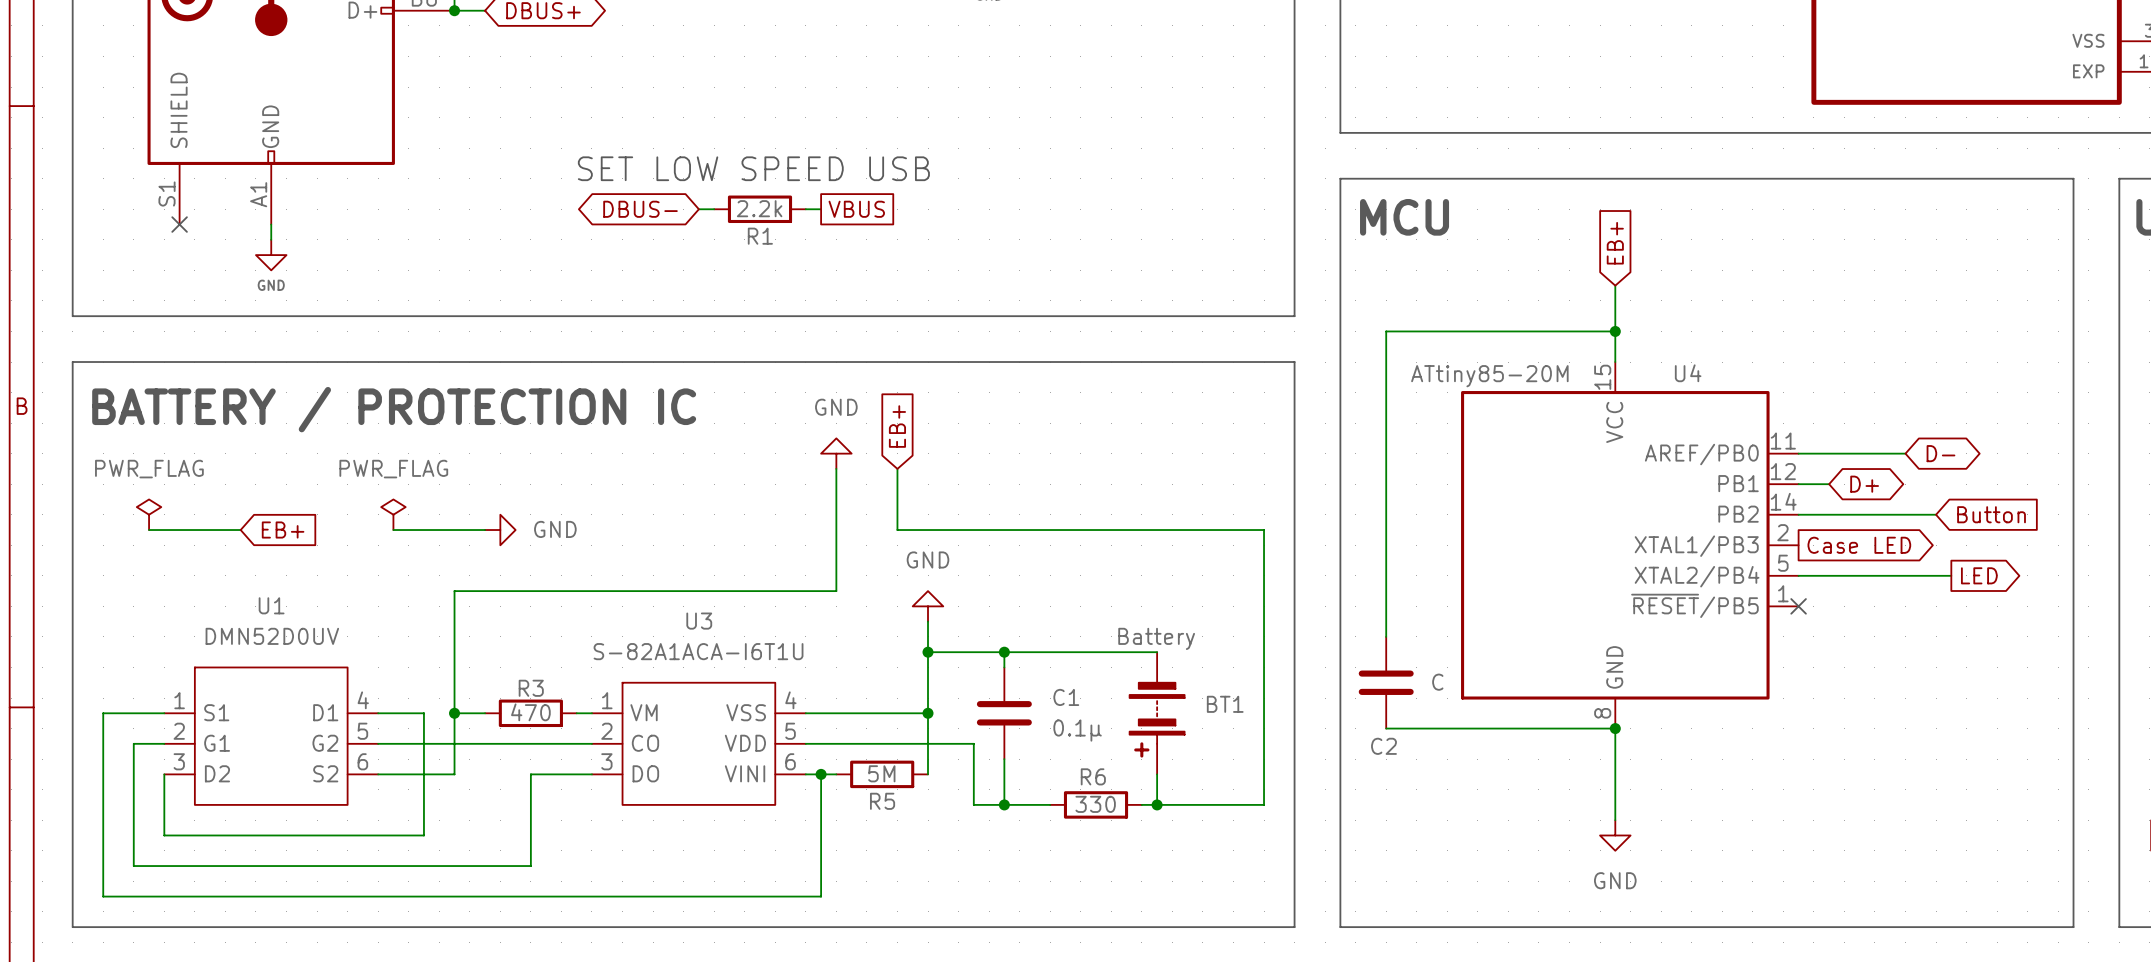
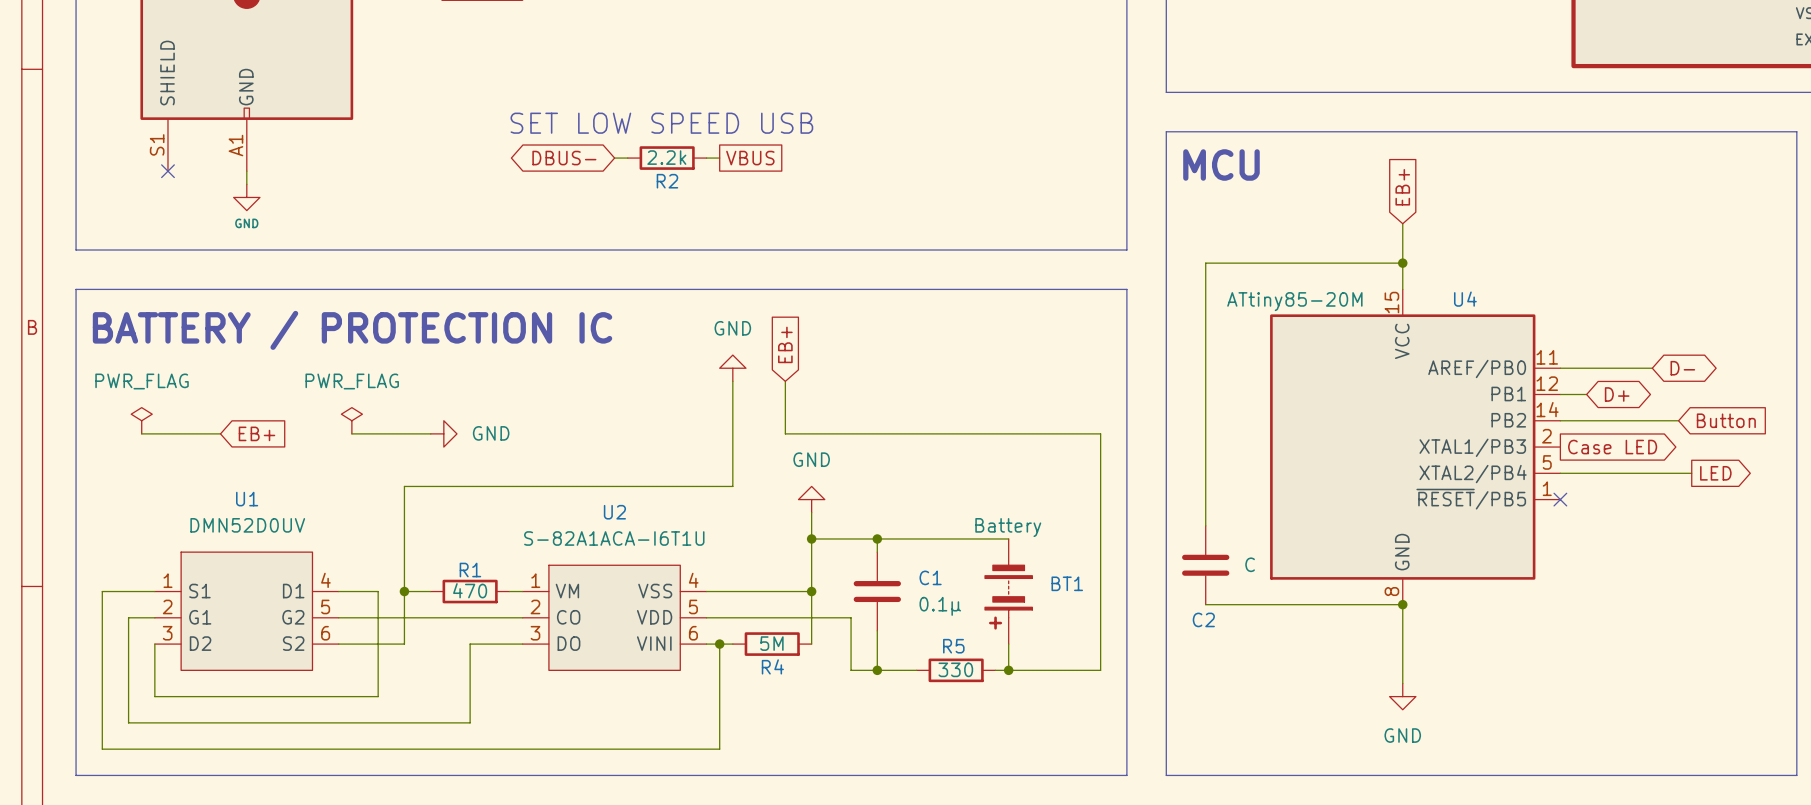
R1 name: R1 (760, 236) -> R2 (667, 181)
U3 name: U3 (699, 621) -> U2 (614, 512)
R3 name: R3 (531, 688) -> R1 (470, 570)
R6 name: R6 (1093, 776) -> R5 (953, 646)
R5 name: R5 (882, 801) -> R4 (772, 666)

